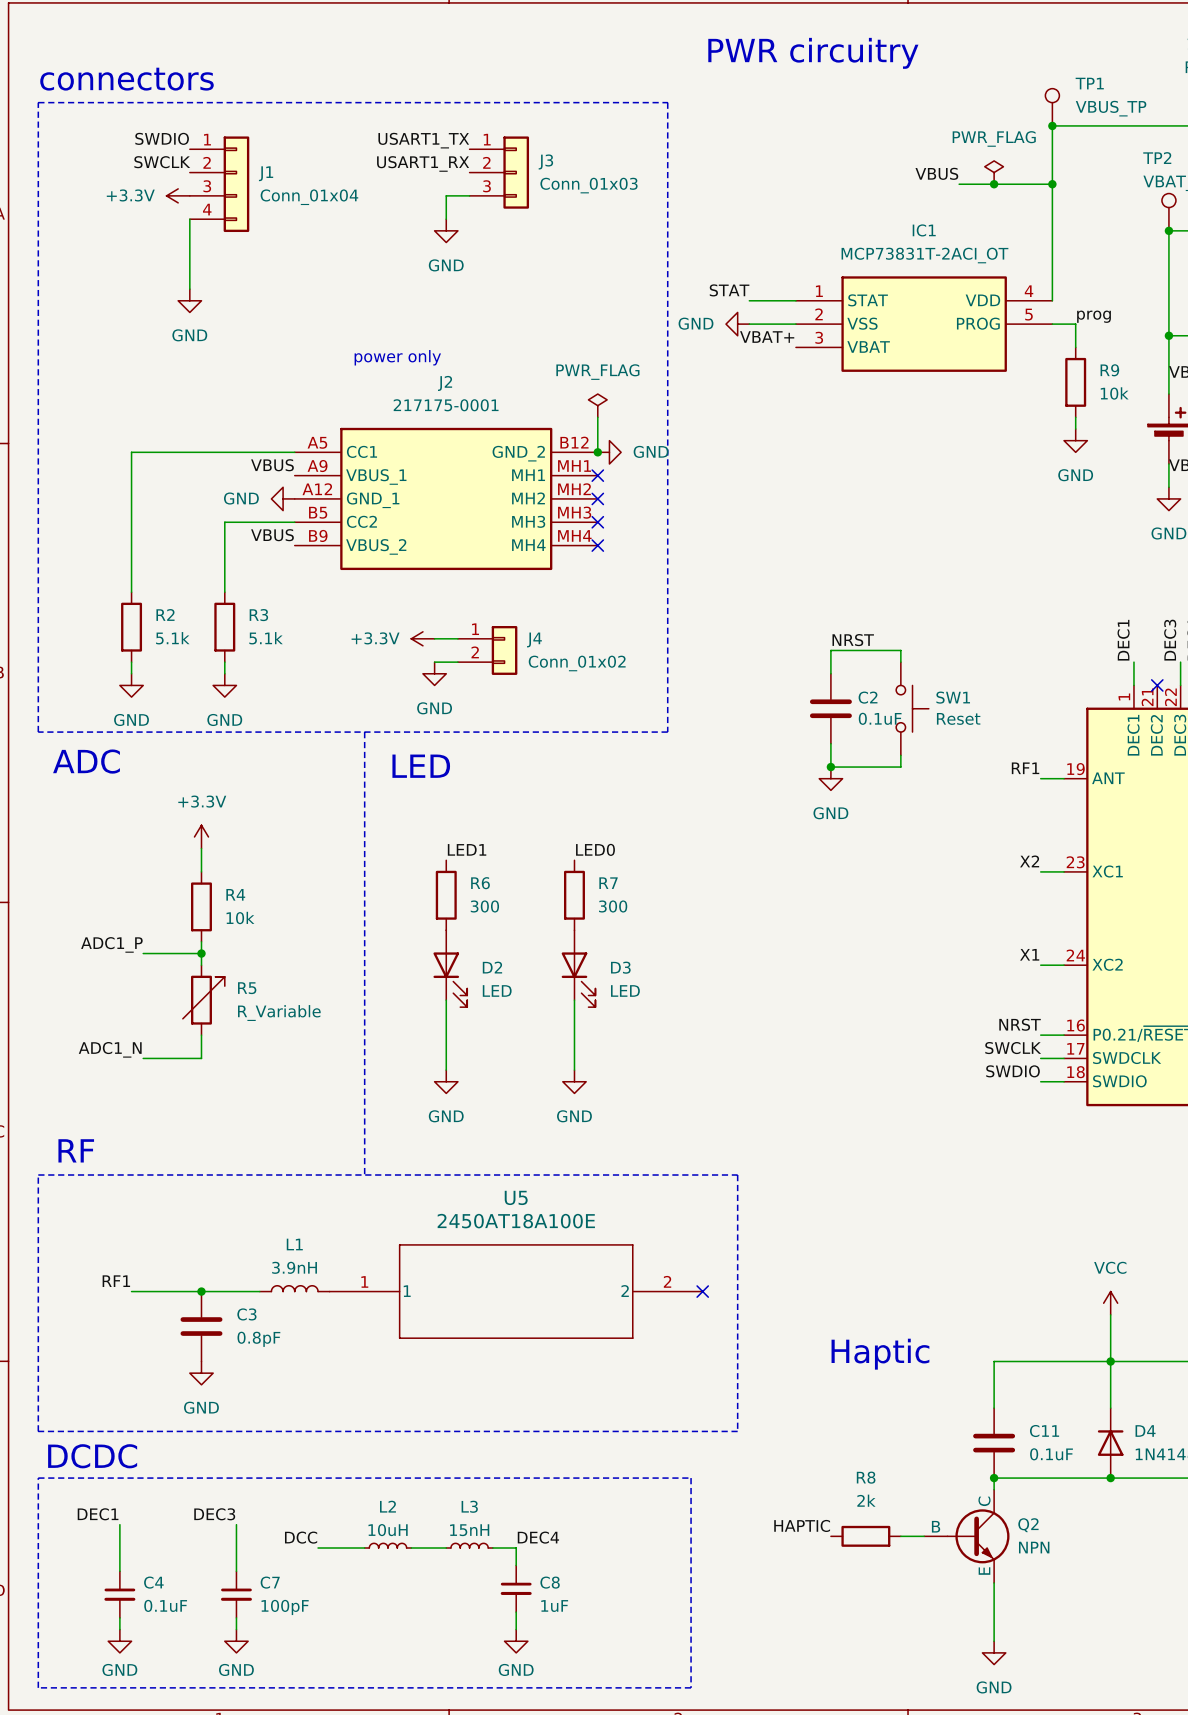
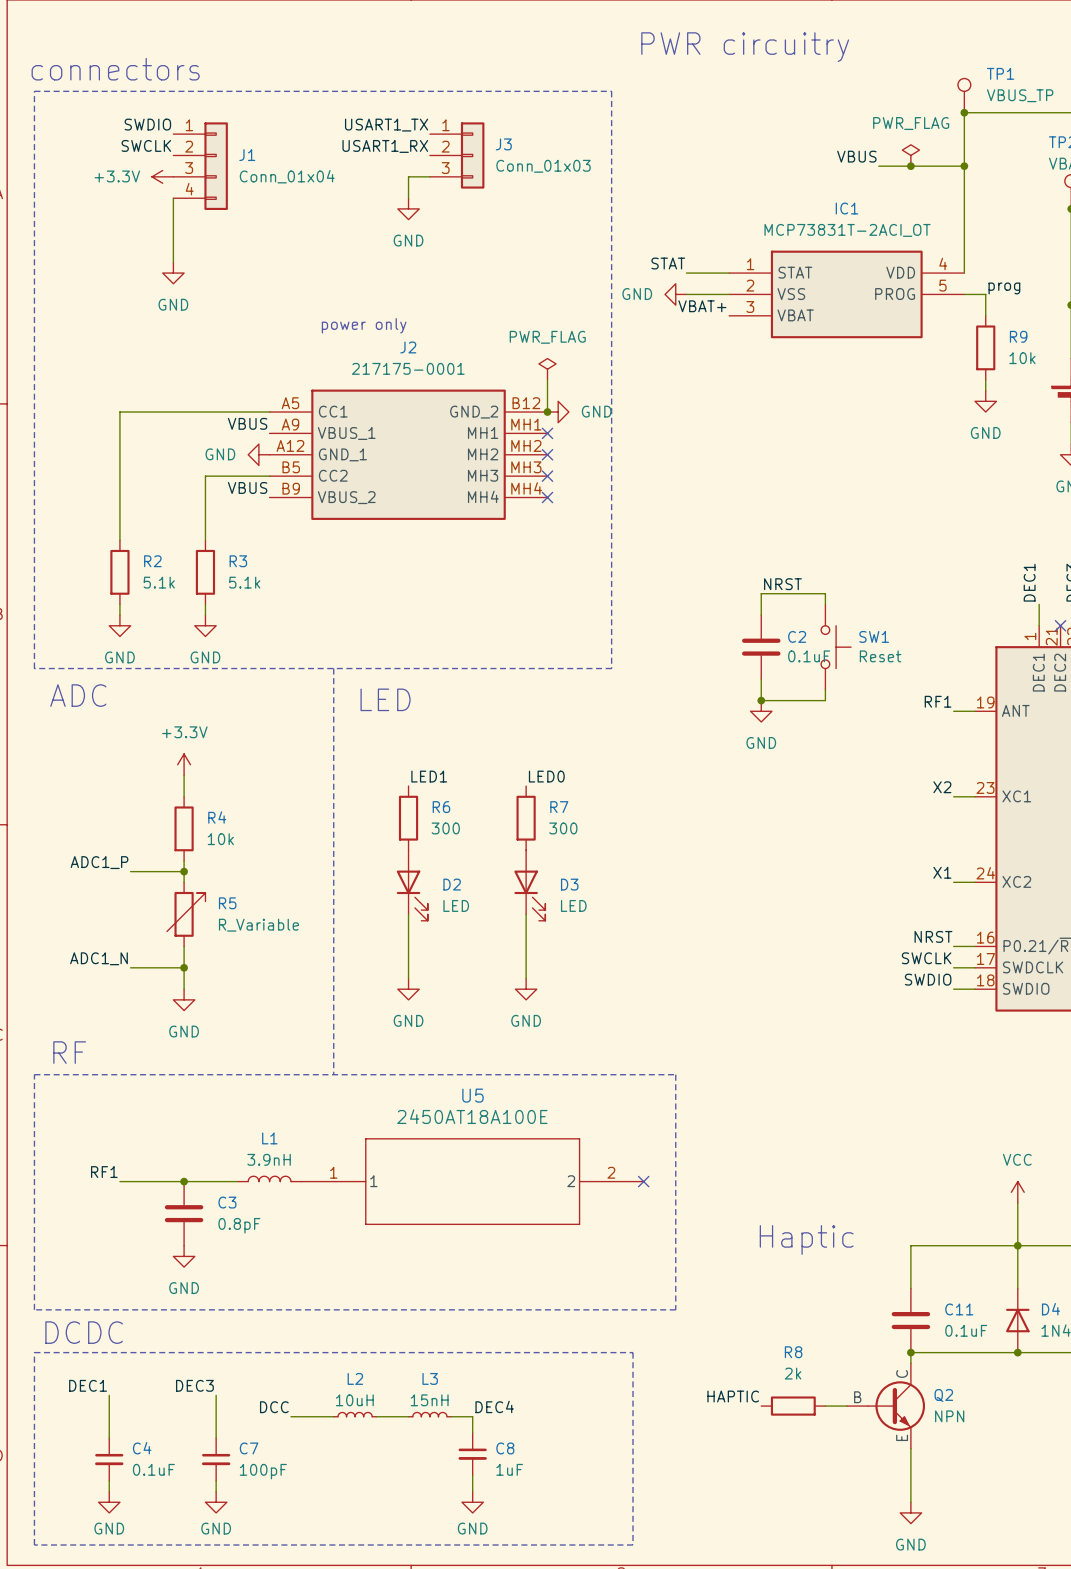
power symbol: +3.3V (422, 638) -> none
wire: (434, 638) (457, 638) -> none
J4: Conn_01x02 (487, 650) -> none
wire: (434, 662) (457, 662) -> none
power symbol: GND (434, 673) -> none
wire: none -> (184, 967) (184, 989)
junction: none -> (184, 967)
power symbol: none -> GND (184, 999)

